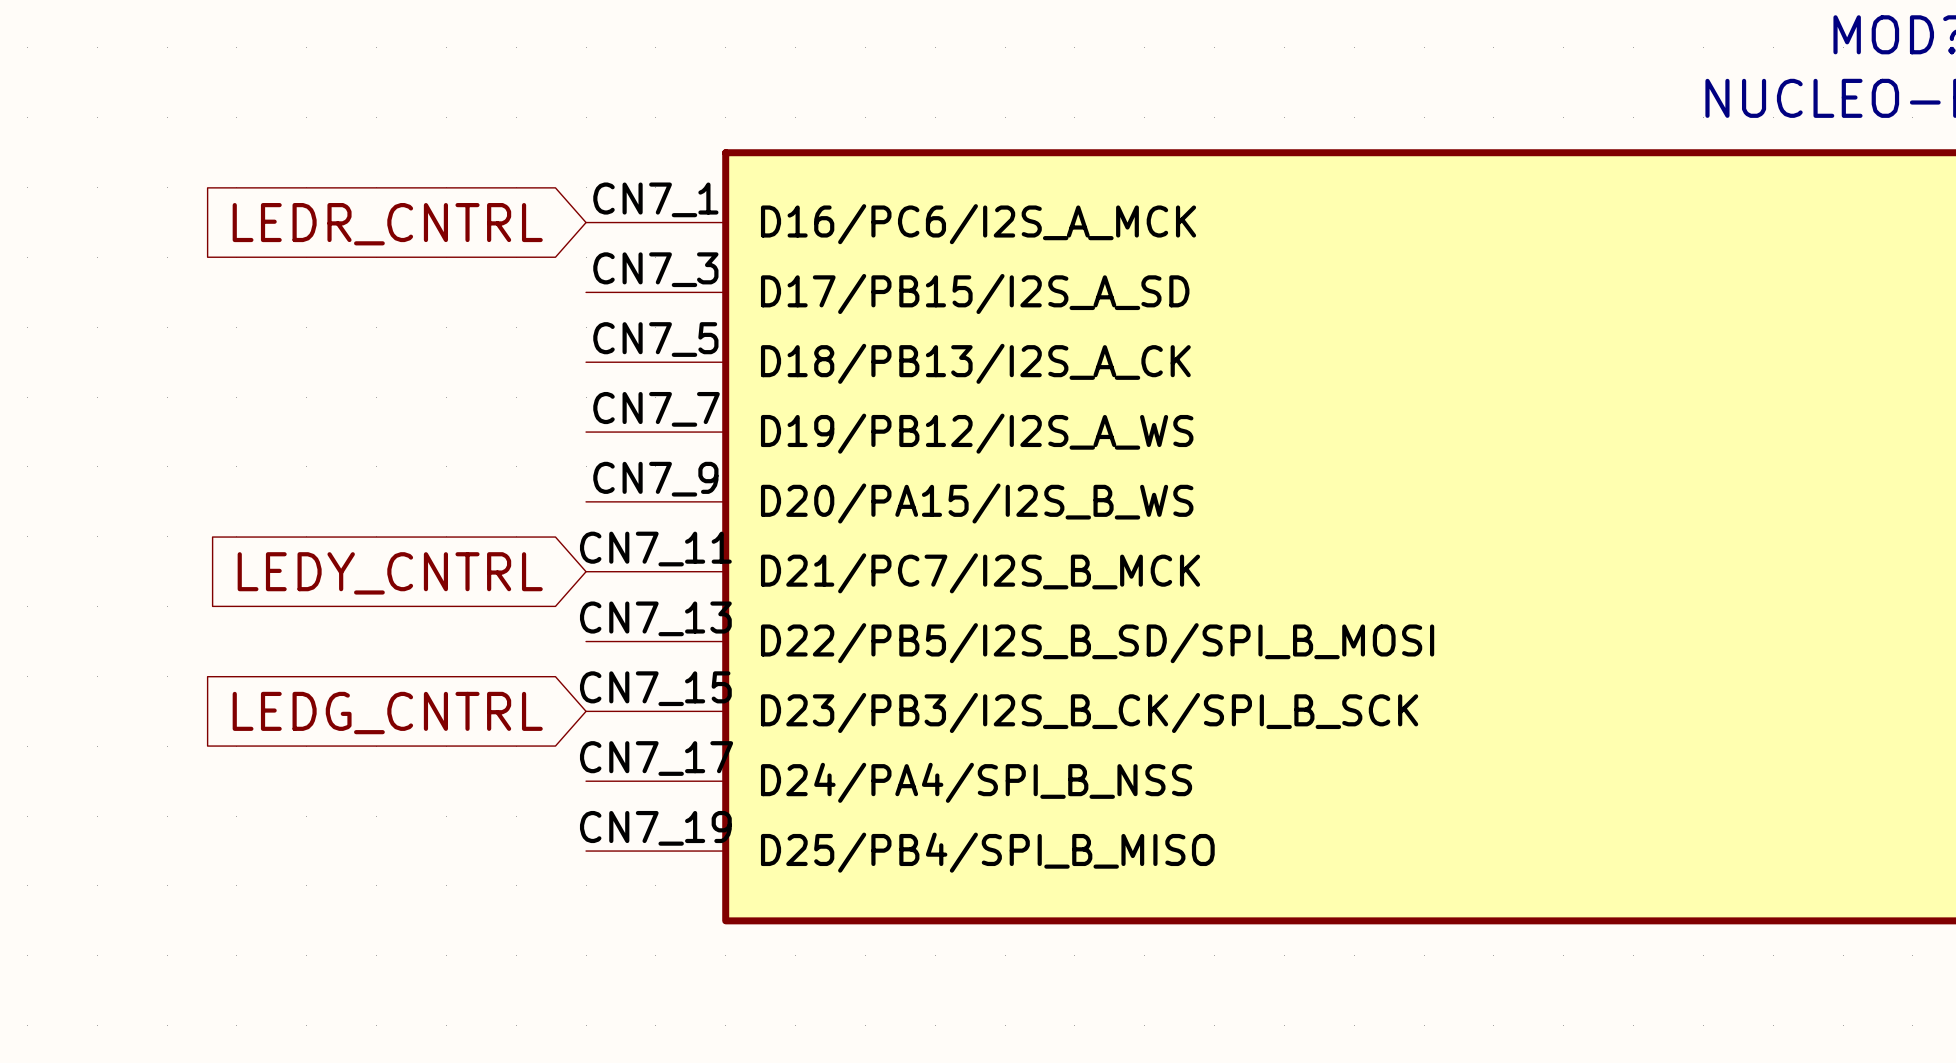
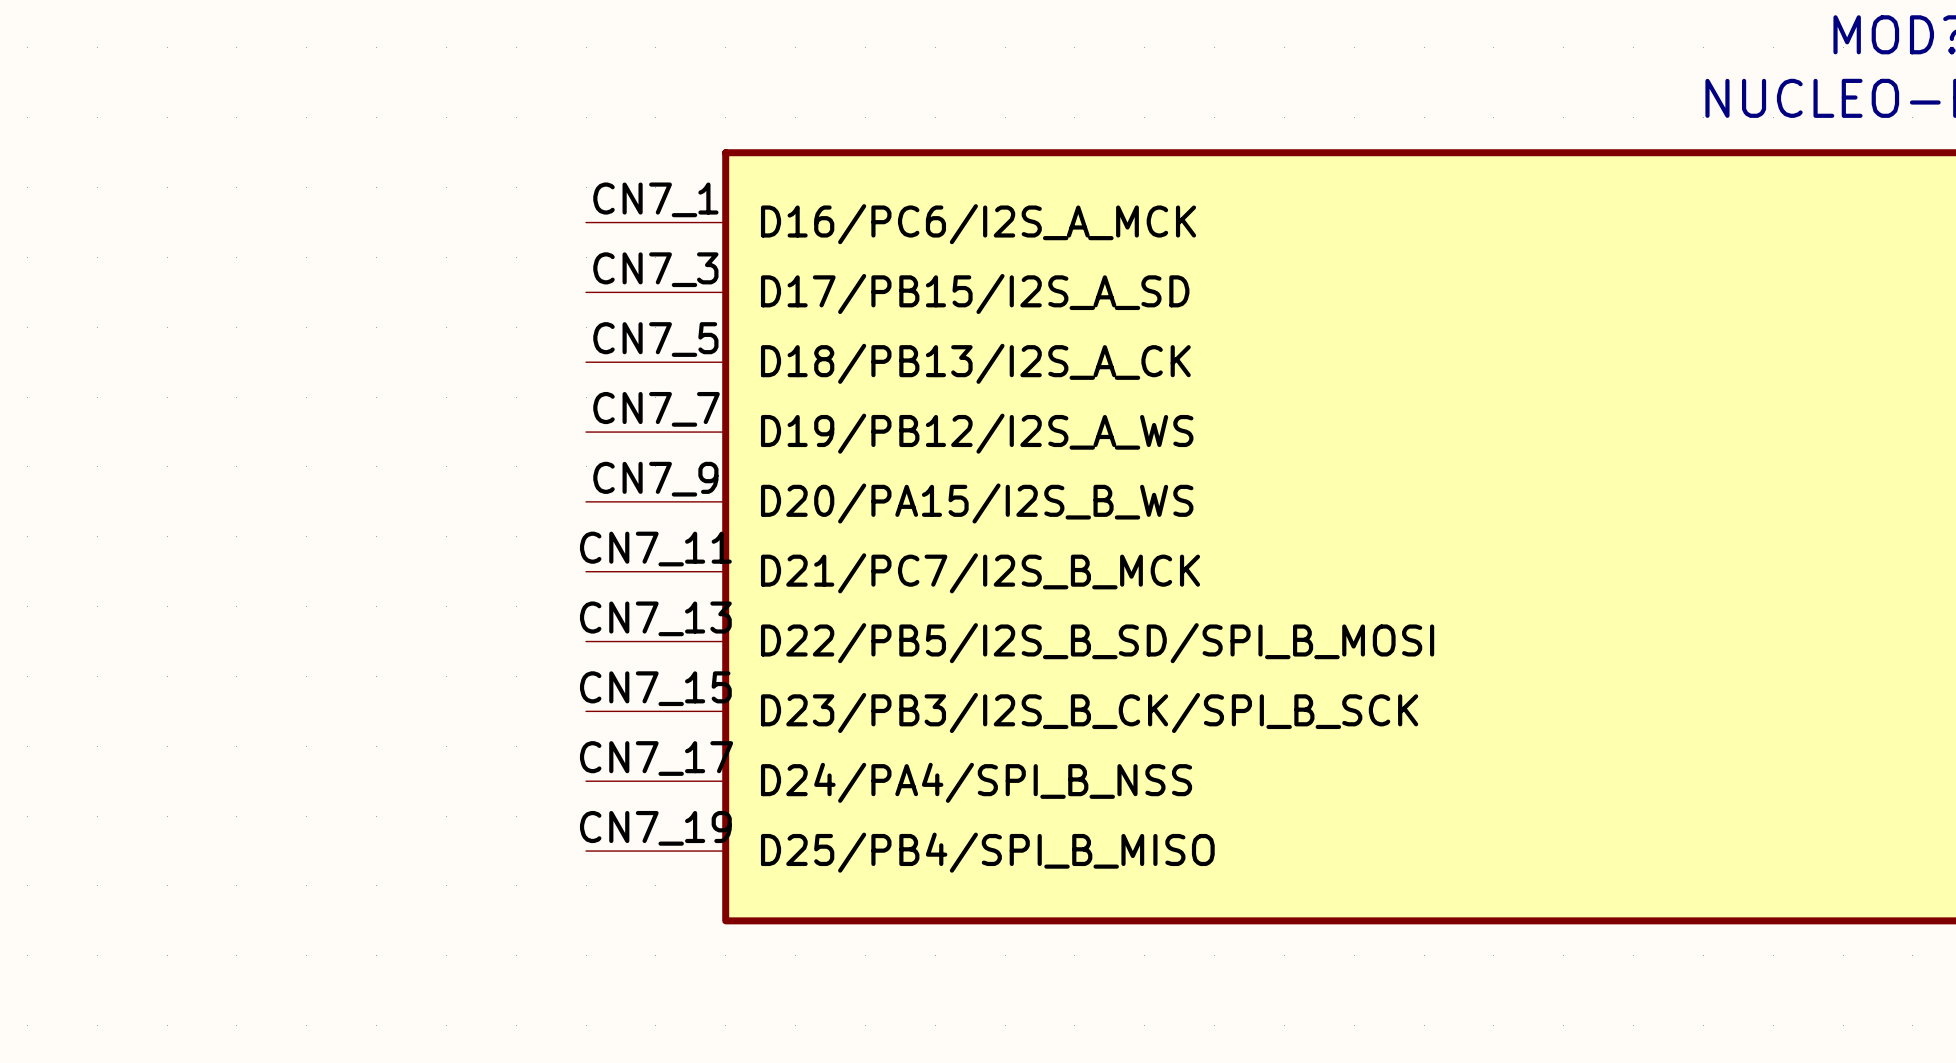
global label: LEDR_CNTRL (387, 224) -> none
global label: LEDY_CNTRL (390, 573) -> none
global label: LEDG_CNTRL (387, 713) -> none

